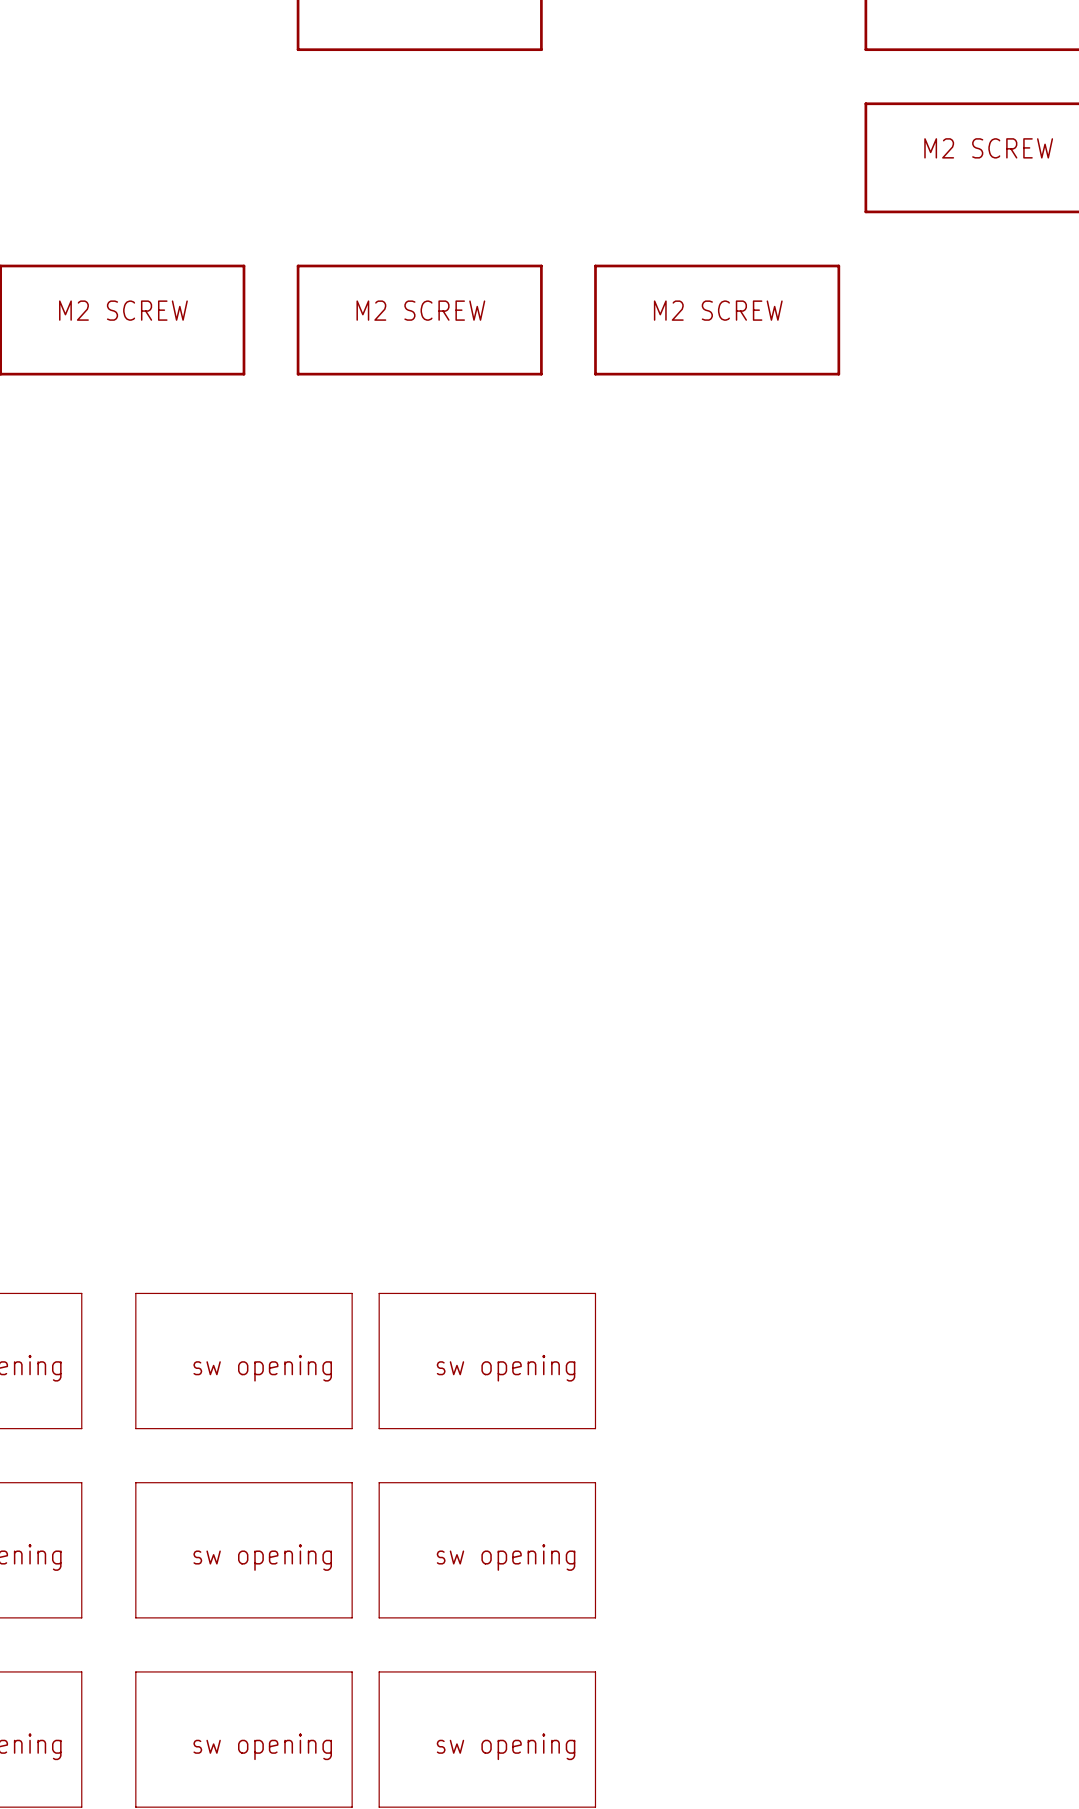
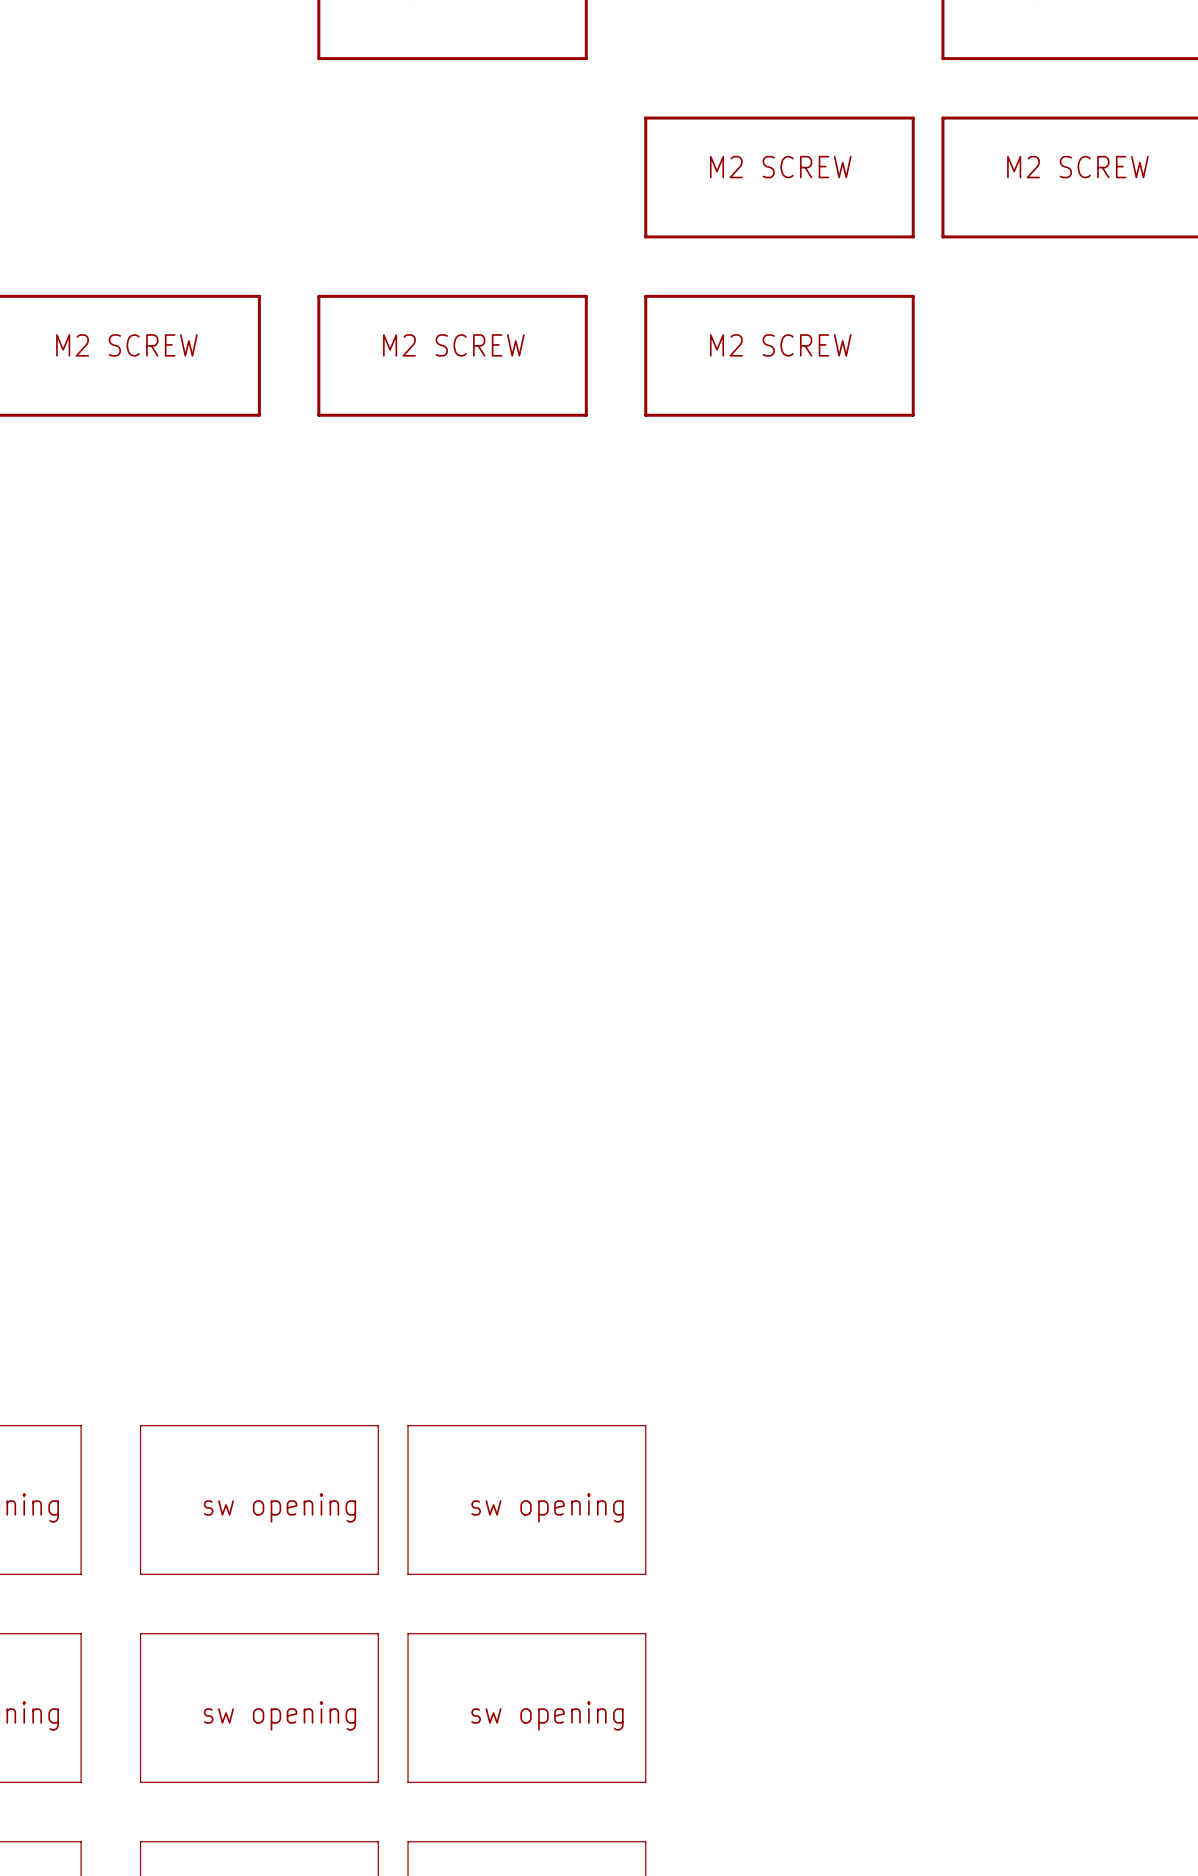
part: none -> (779, 177)

